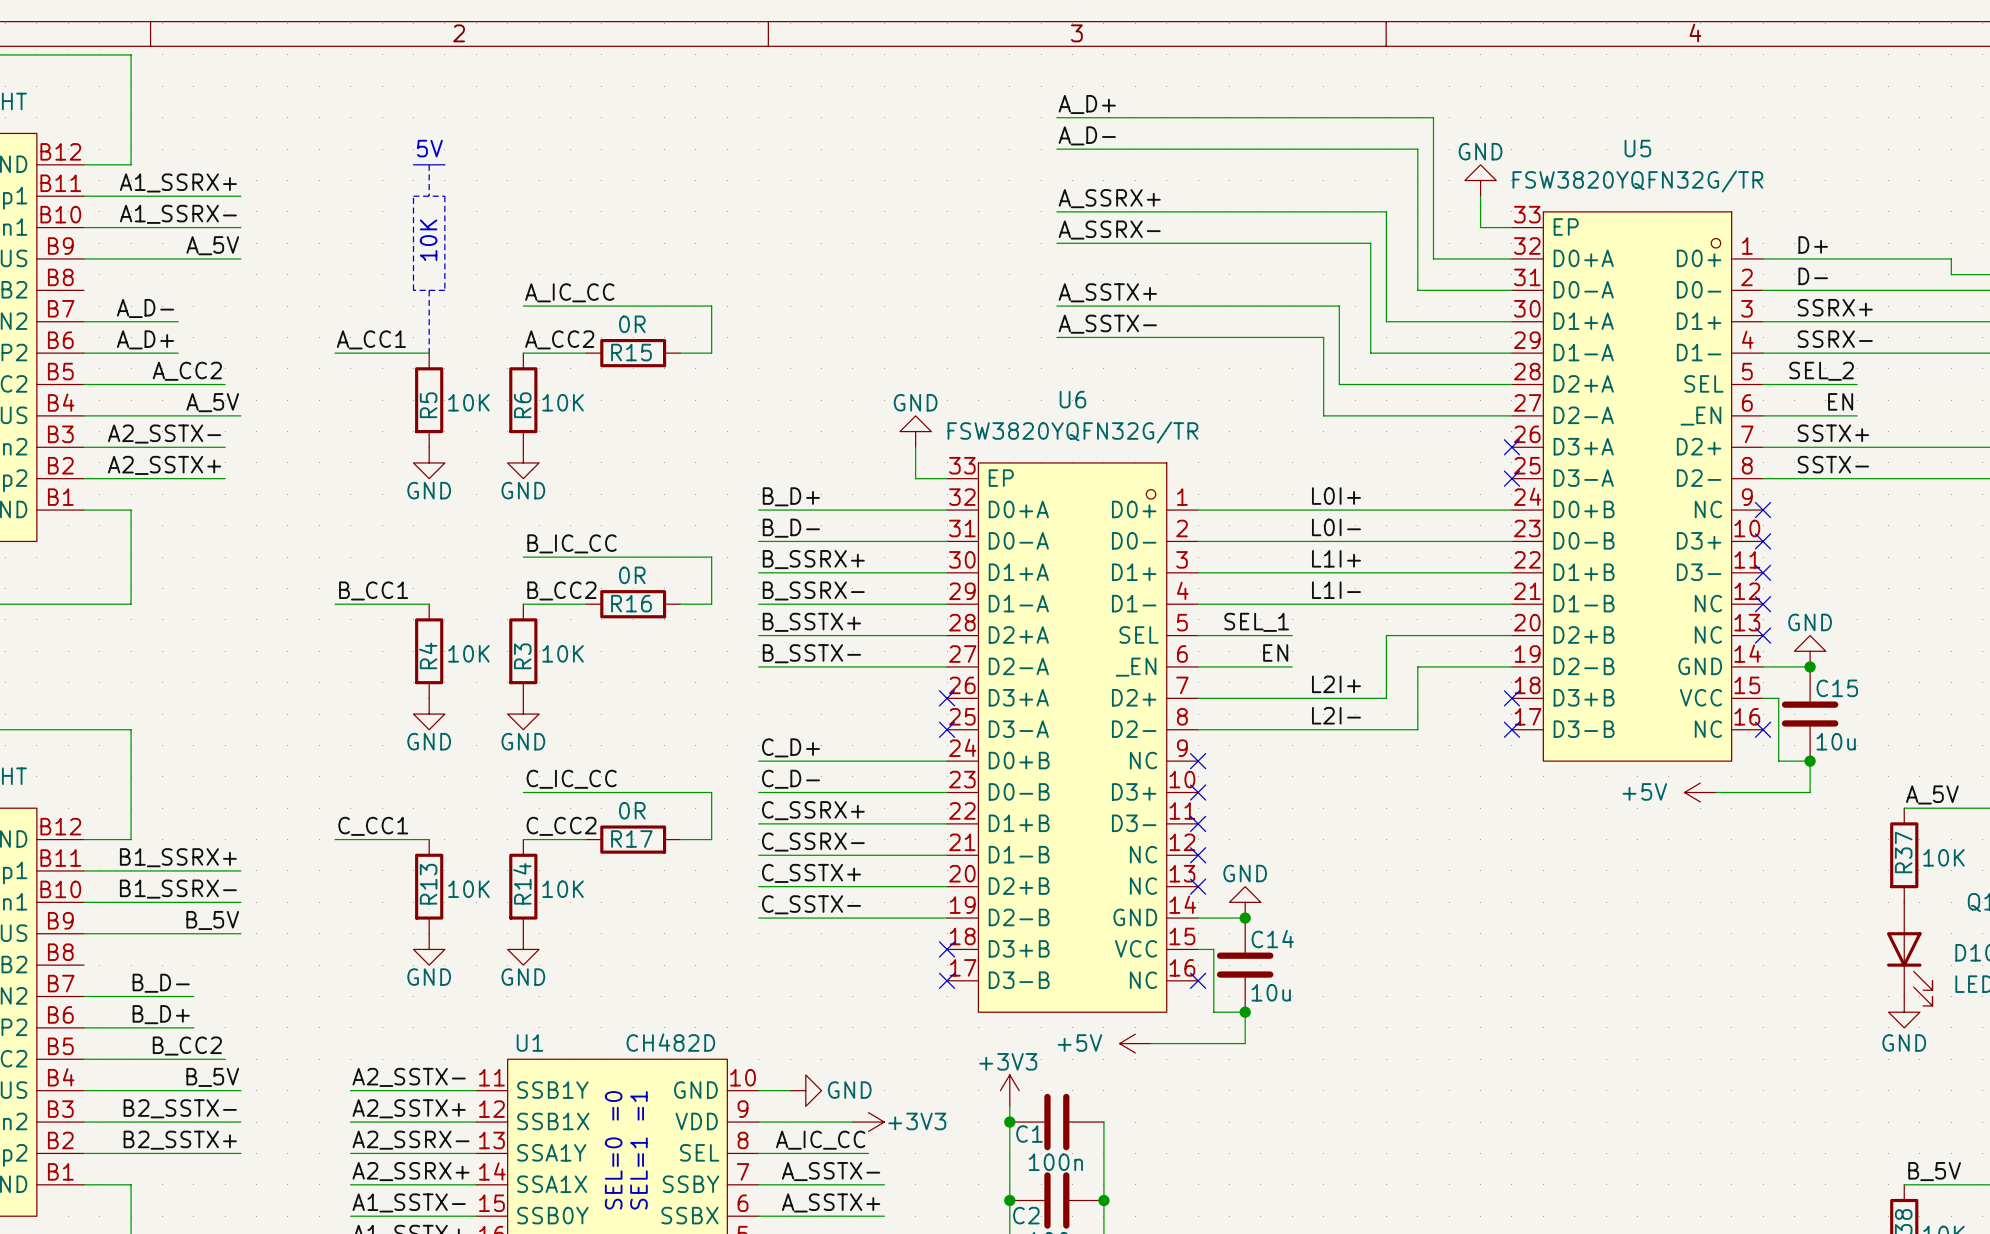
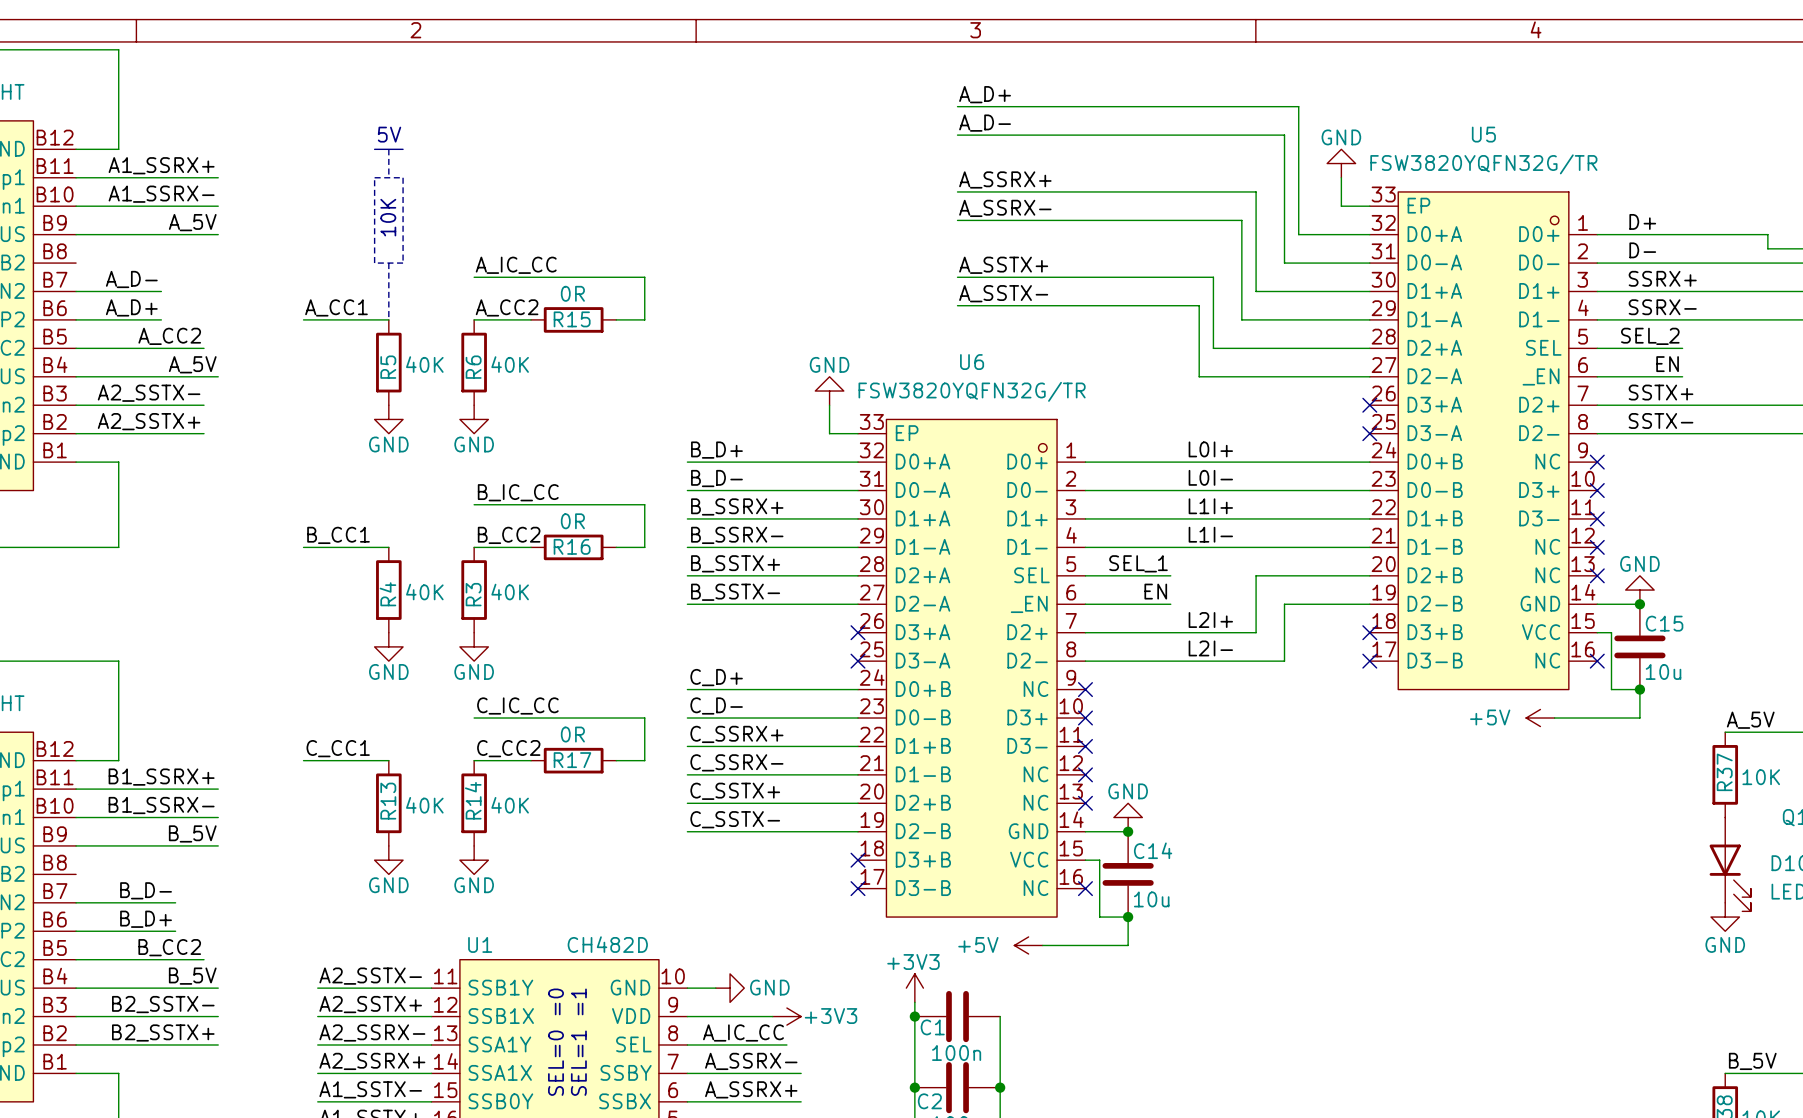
R5 value: 10K (468, 402) -> 40K (424, 364)
R6 value: 10K (563, 402) -> 40K (510, 364)
R4 value: 10K (468, 653) -> 40K (424, 592)
R3 value: 10K (563, 653) -> 40K (510, 592)
R13 value: 10K (468, 889) -> 40K (424, 805)
R14 value: 10K (563, 889) -> 40K (510, 805)
label: A_SSTX- (831, 1171) -> A_SSRX- (751, 1061)
label: A_SSTX+ (831, 1202) -> A_SSRX+ (751, 1089)

